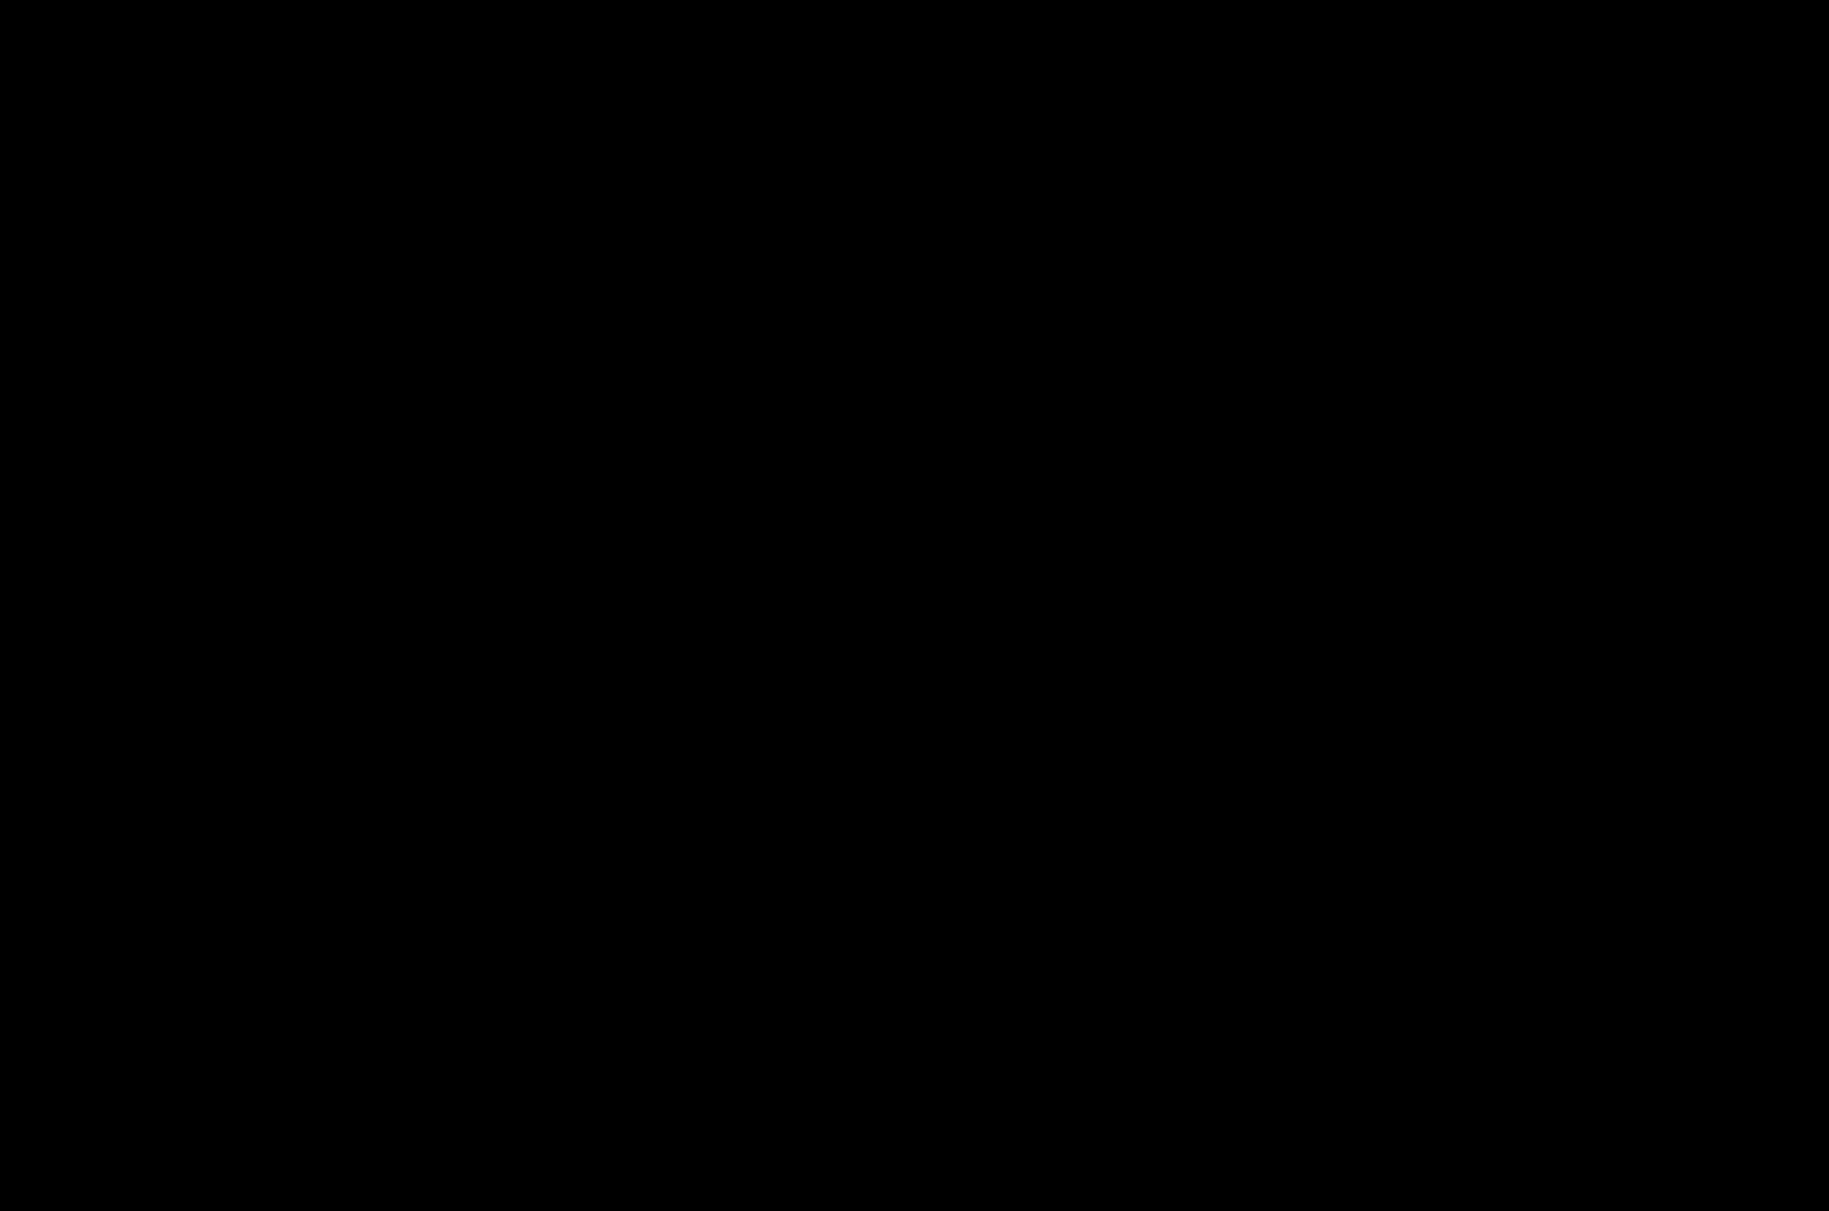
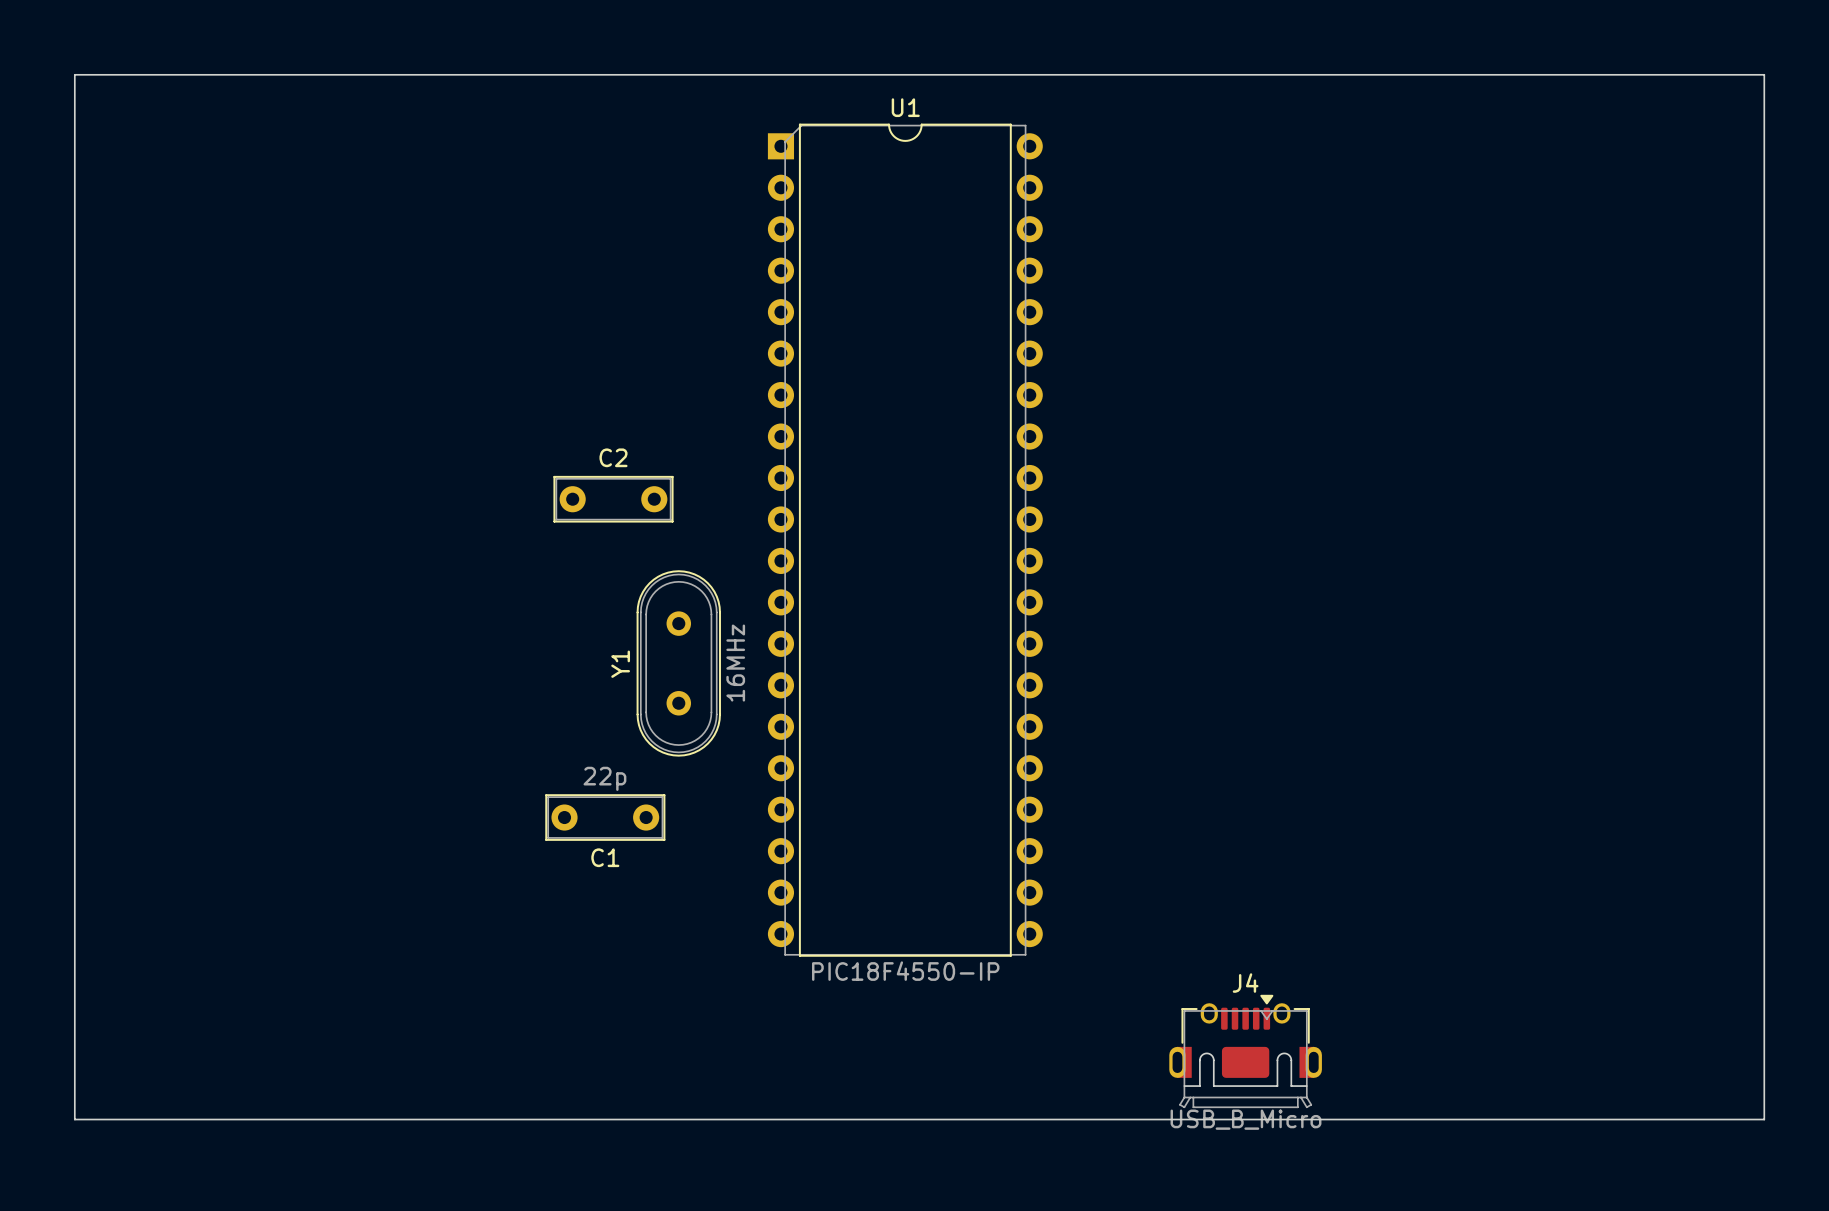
board edge: none -> (74, 74) (1764, 74) (1764, 1119) (74, 1119) (74, 74)
C2: none -> (613, 499)
U1: none -> PIC18F4550-IP (905, 540)
Y1: none -> 16MHz (678, 663)
C1: none -> 22p (605, 817)
J4: none -> USB_B_Micro (1245, 1051)

